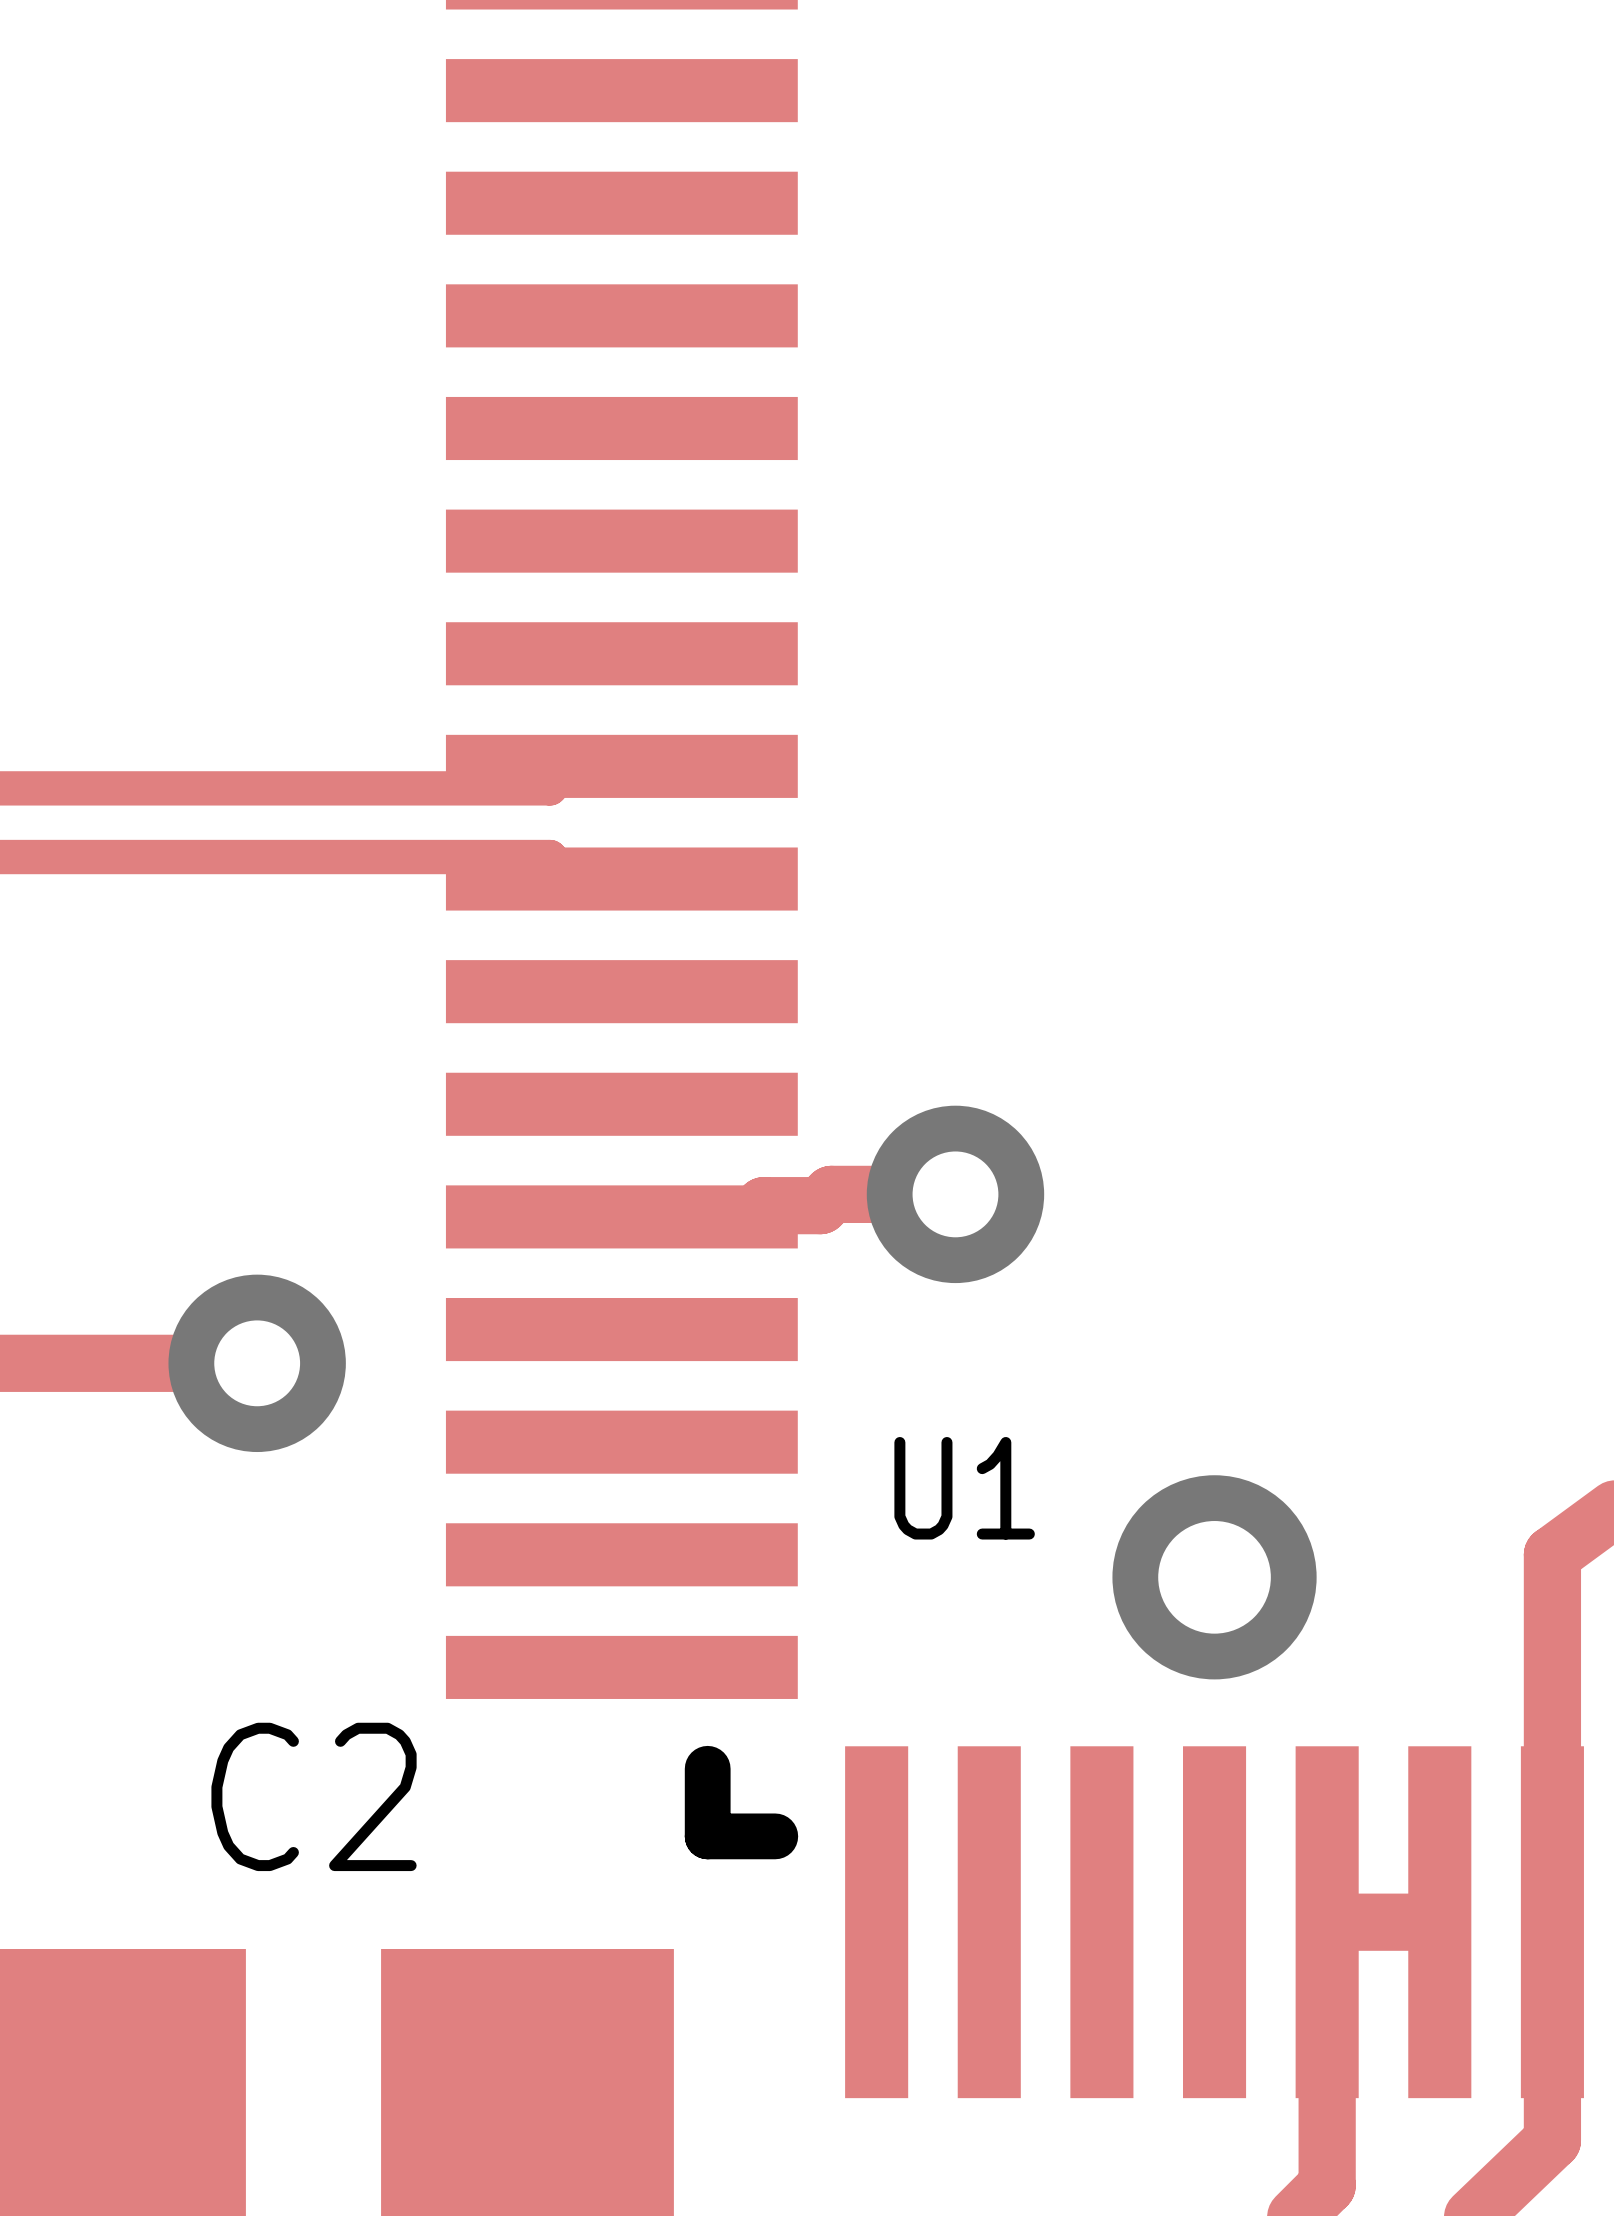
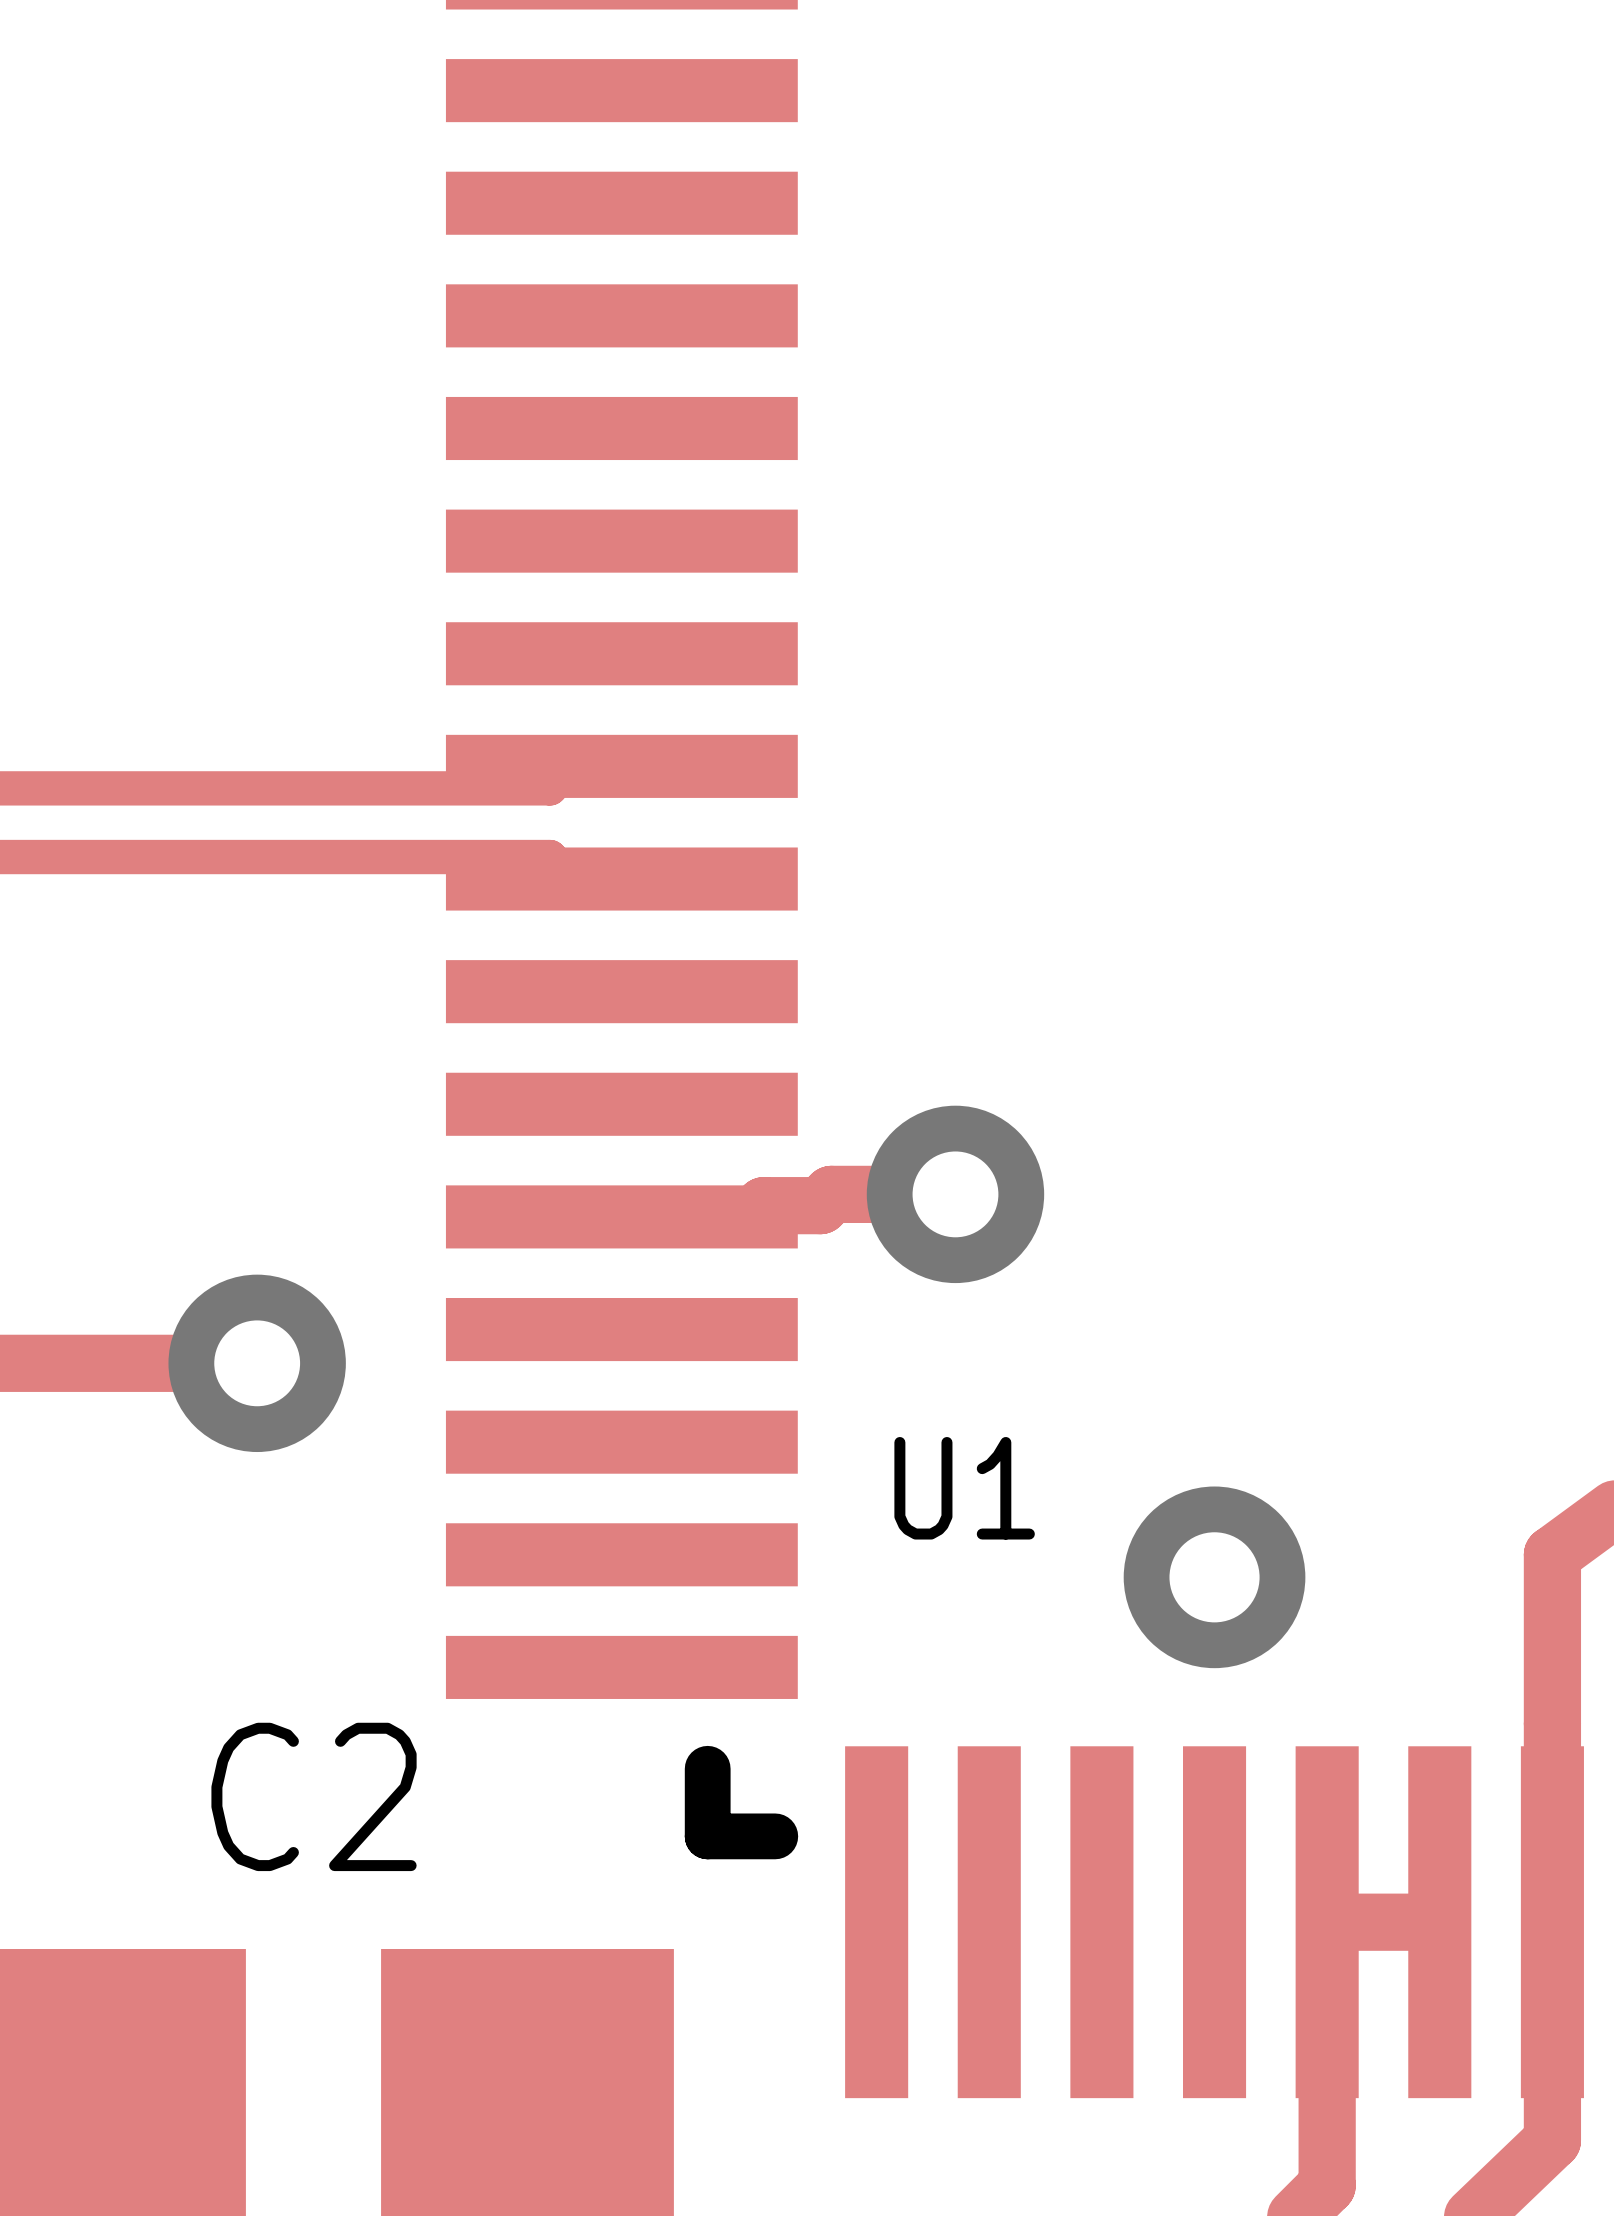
via size: [1112, 1475, 1317, 1680] -> [1123, 1486, 1306, 1669]

